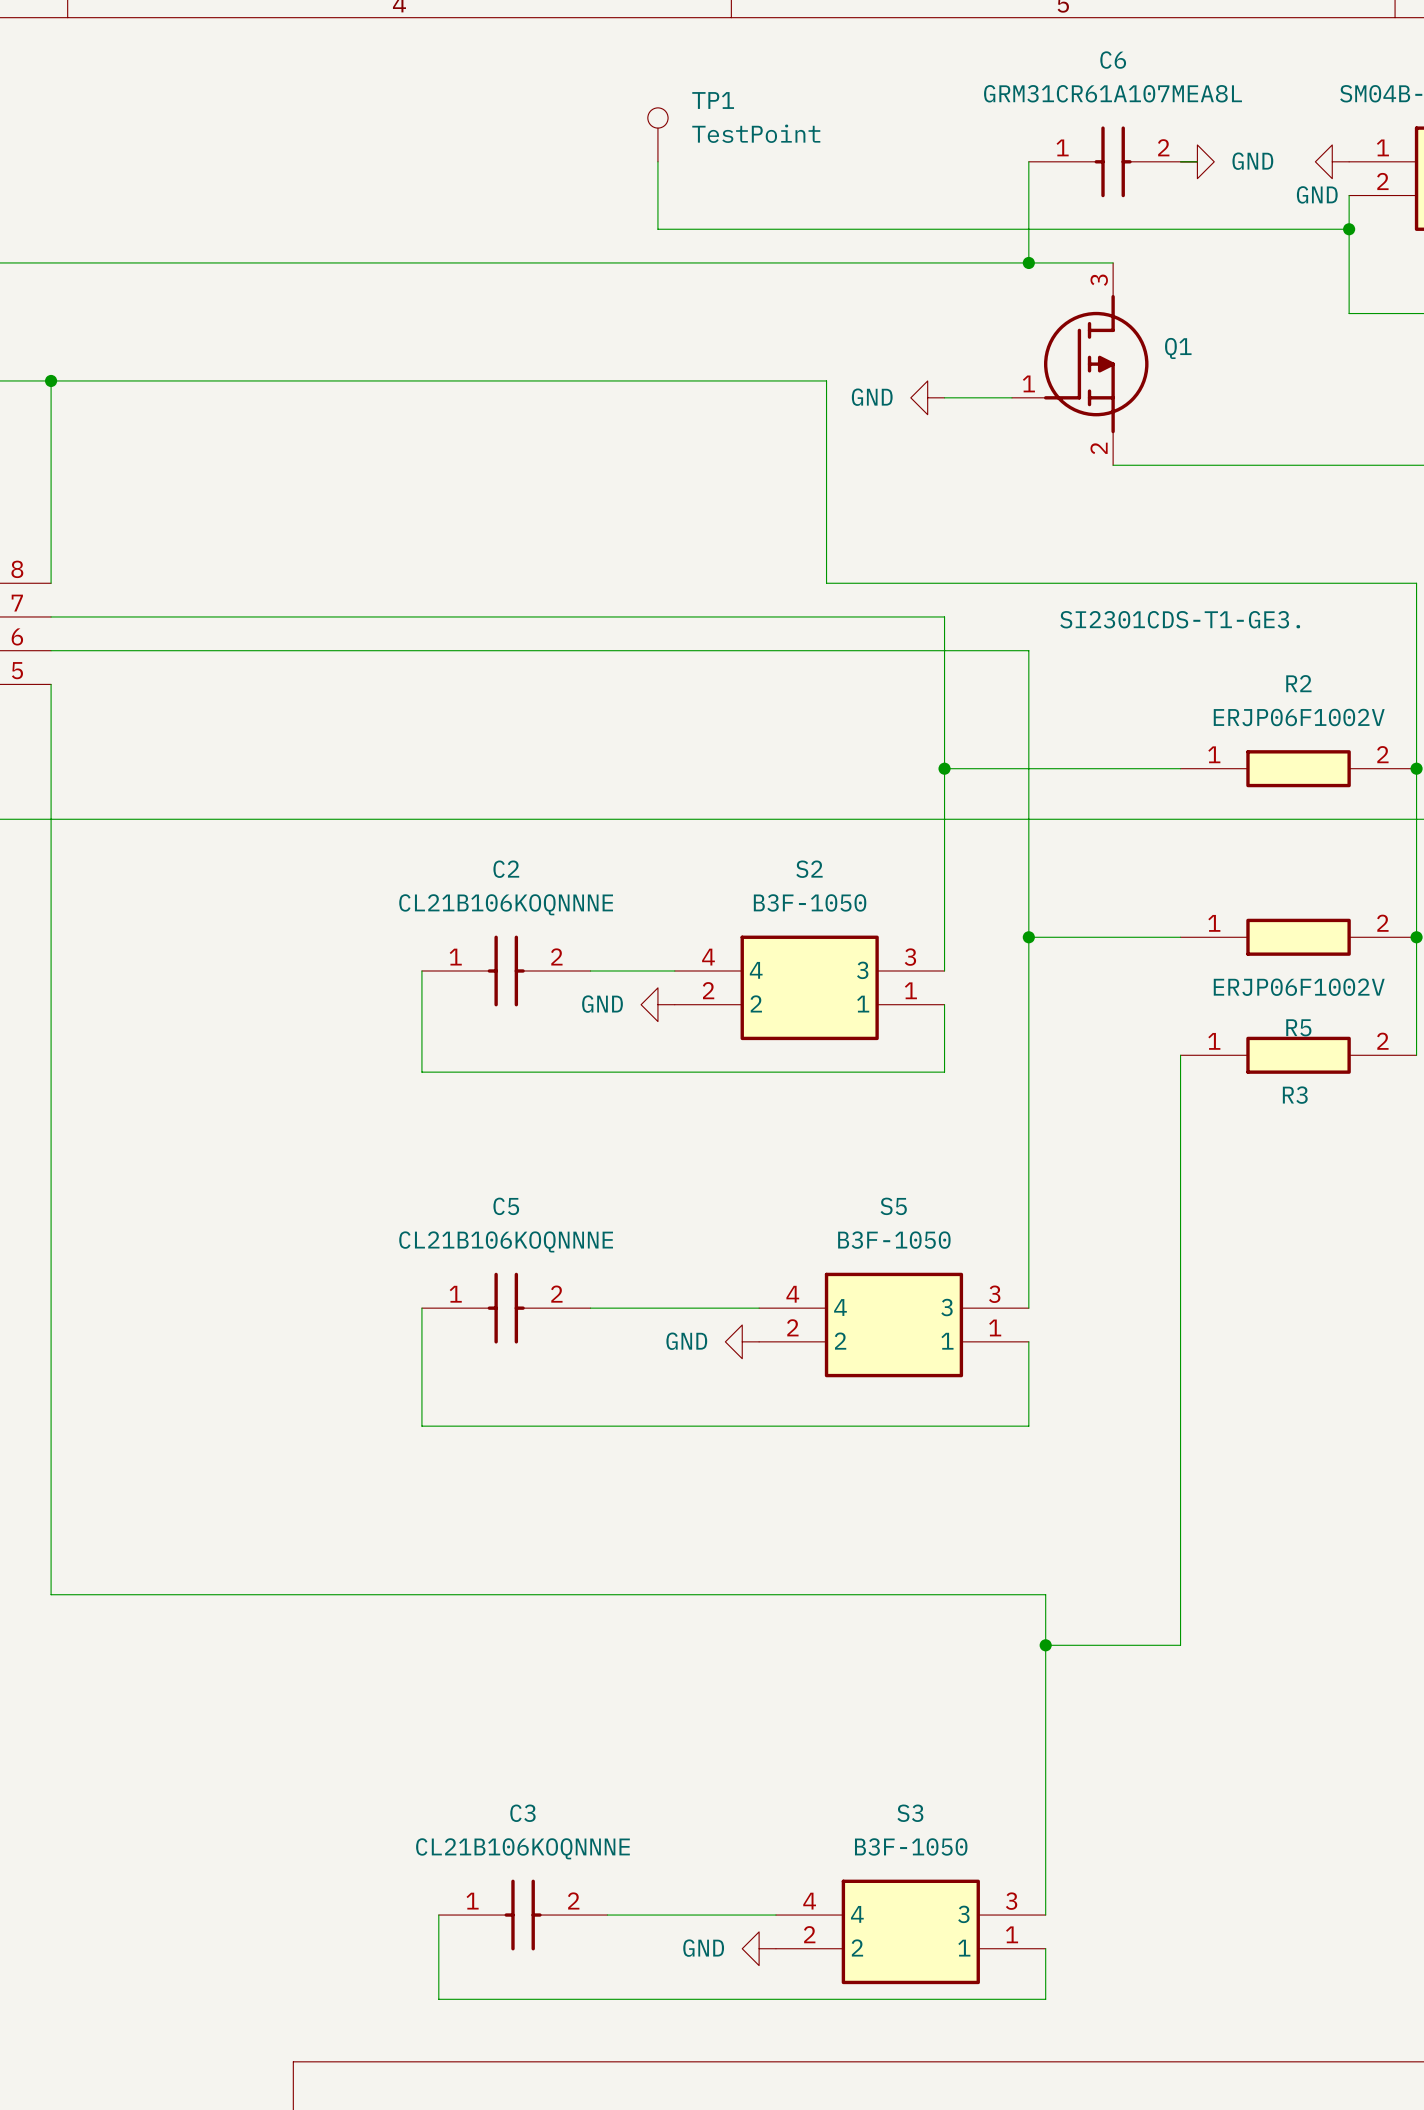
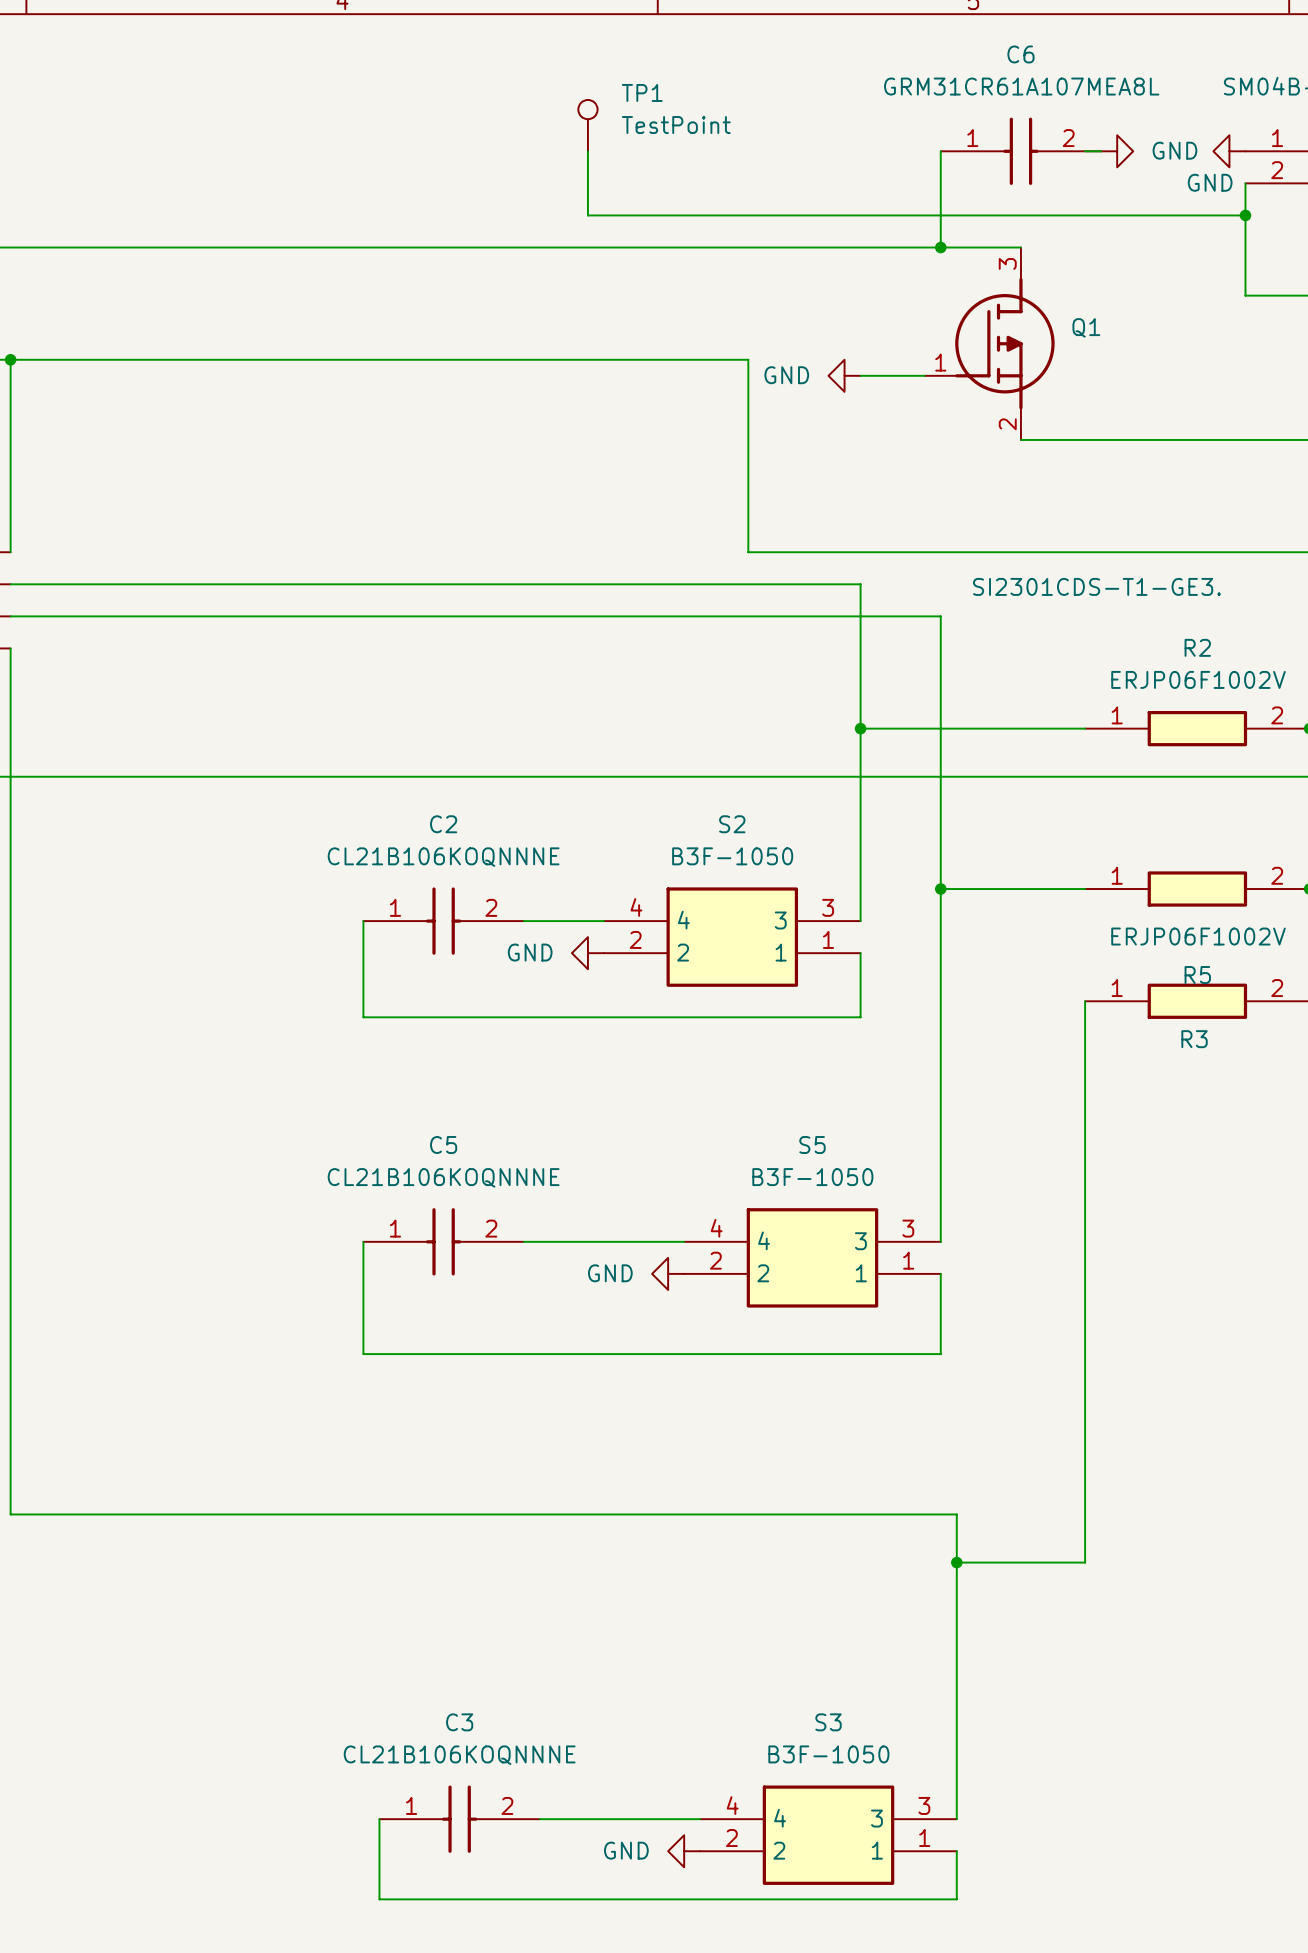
power symbol position: GND (1197, 161) -> GND (1117, 151)

